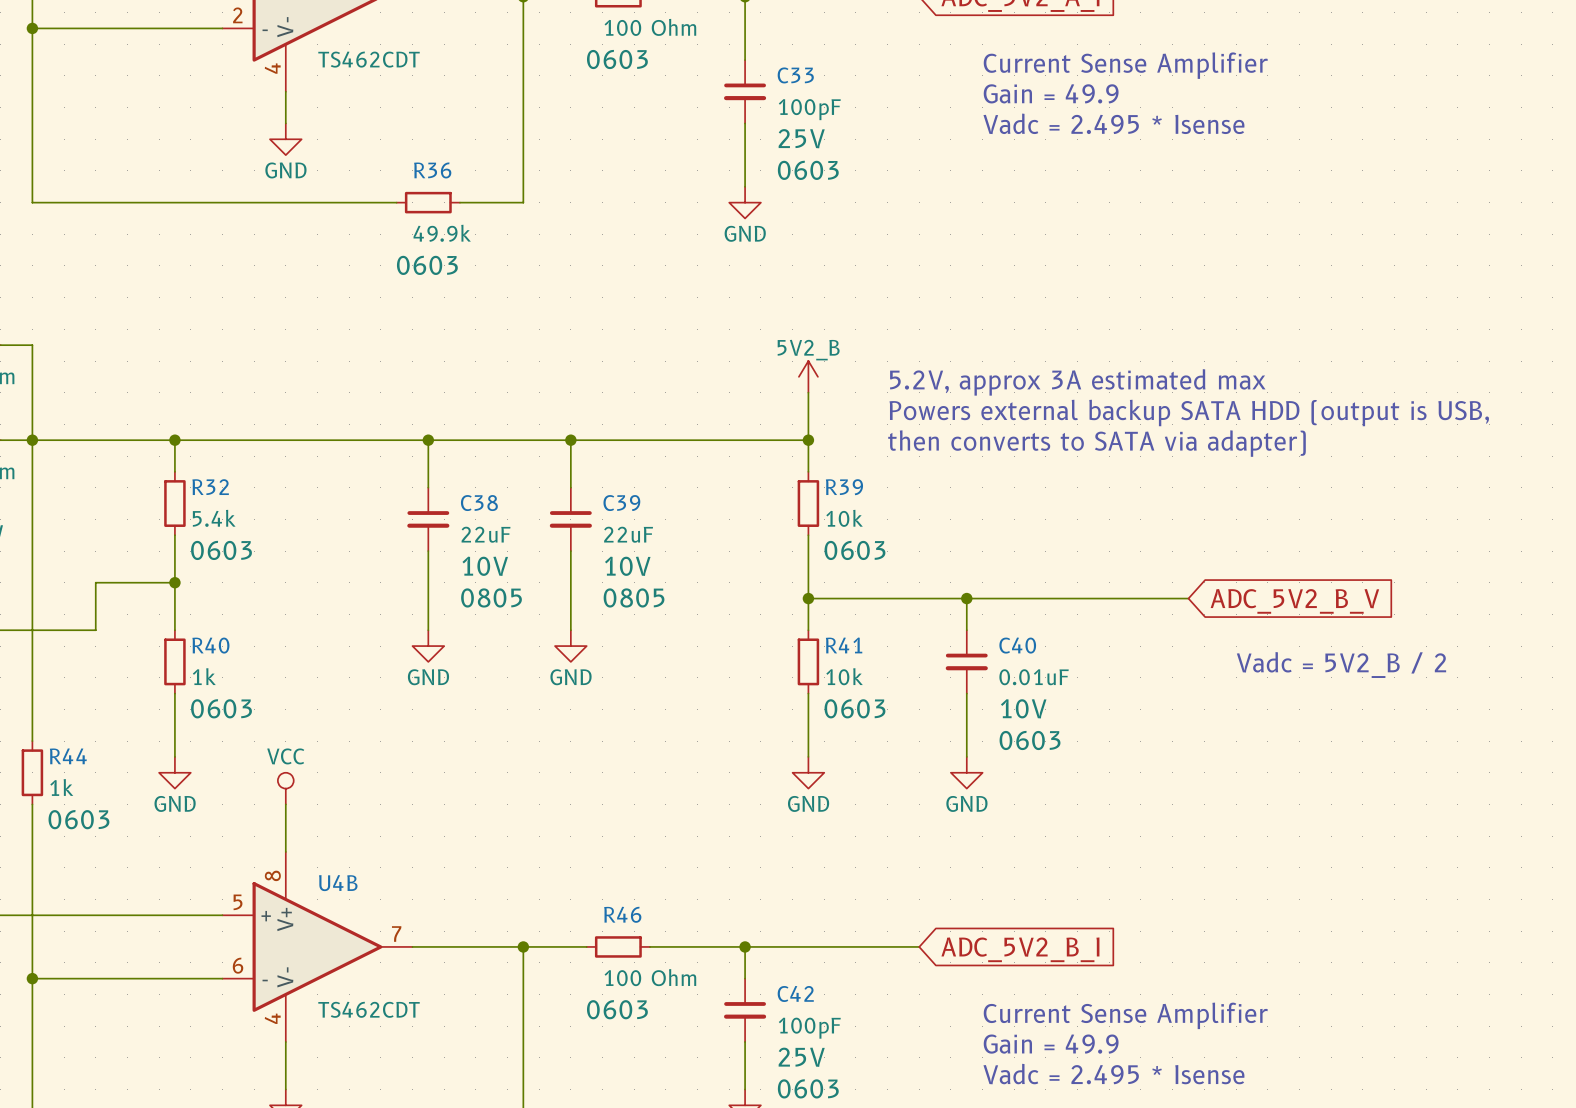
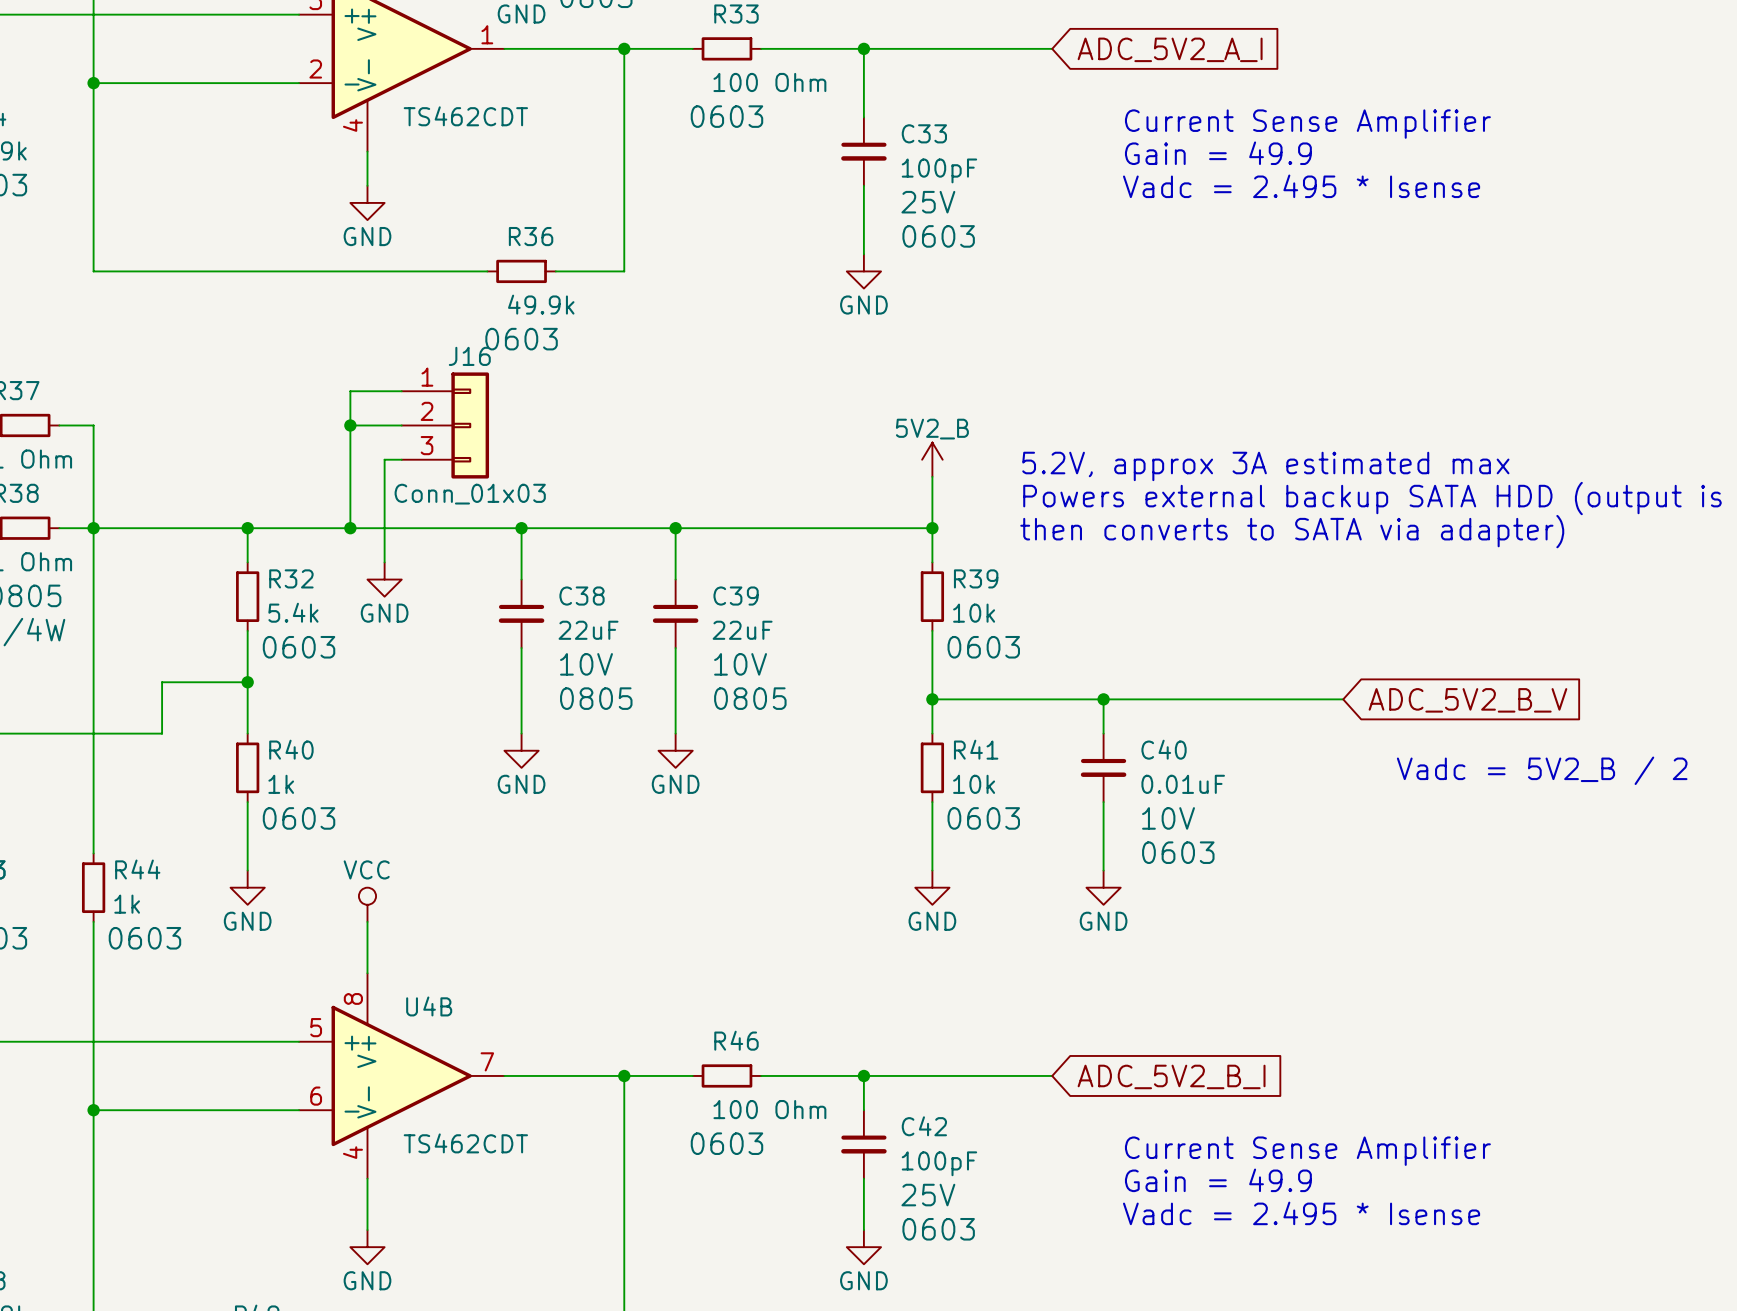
wire: none -> (401, 391) (350, 391) (350, 528)
wire: none -> (350, 425) (401, 425)
junction: none -> (350, 425)
J16: none -> Conn_01x03 (445, 425)
wire: none -> (401, 459) (384, 459) (384, 562)
junction: none -> (350, 528)
power symbol: none -> GND (384, 579)

